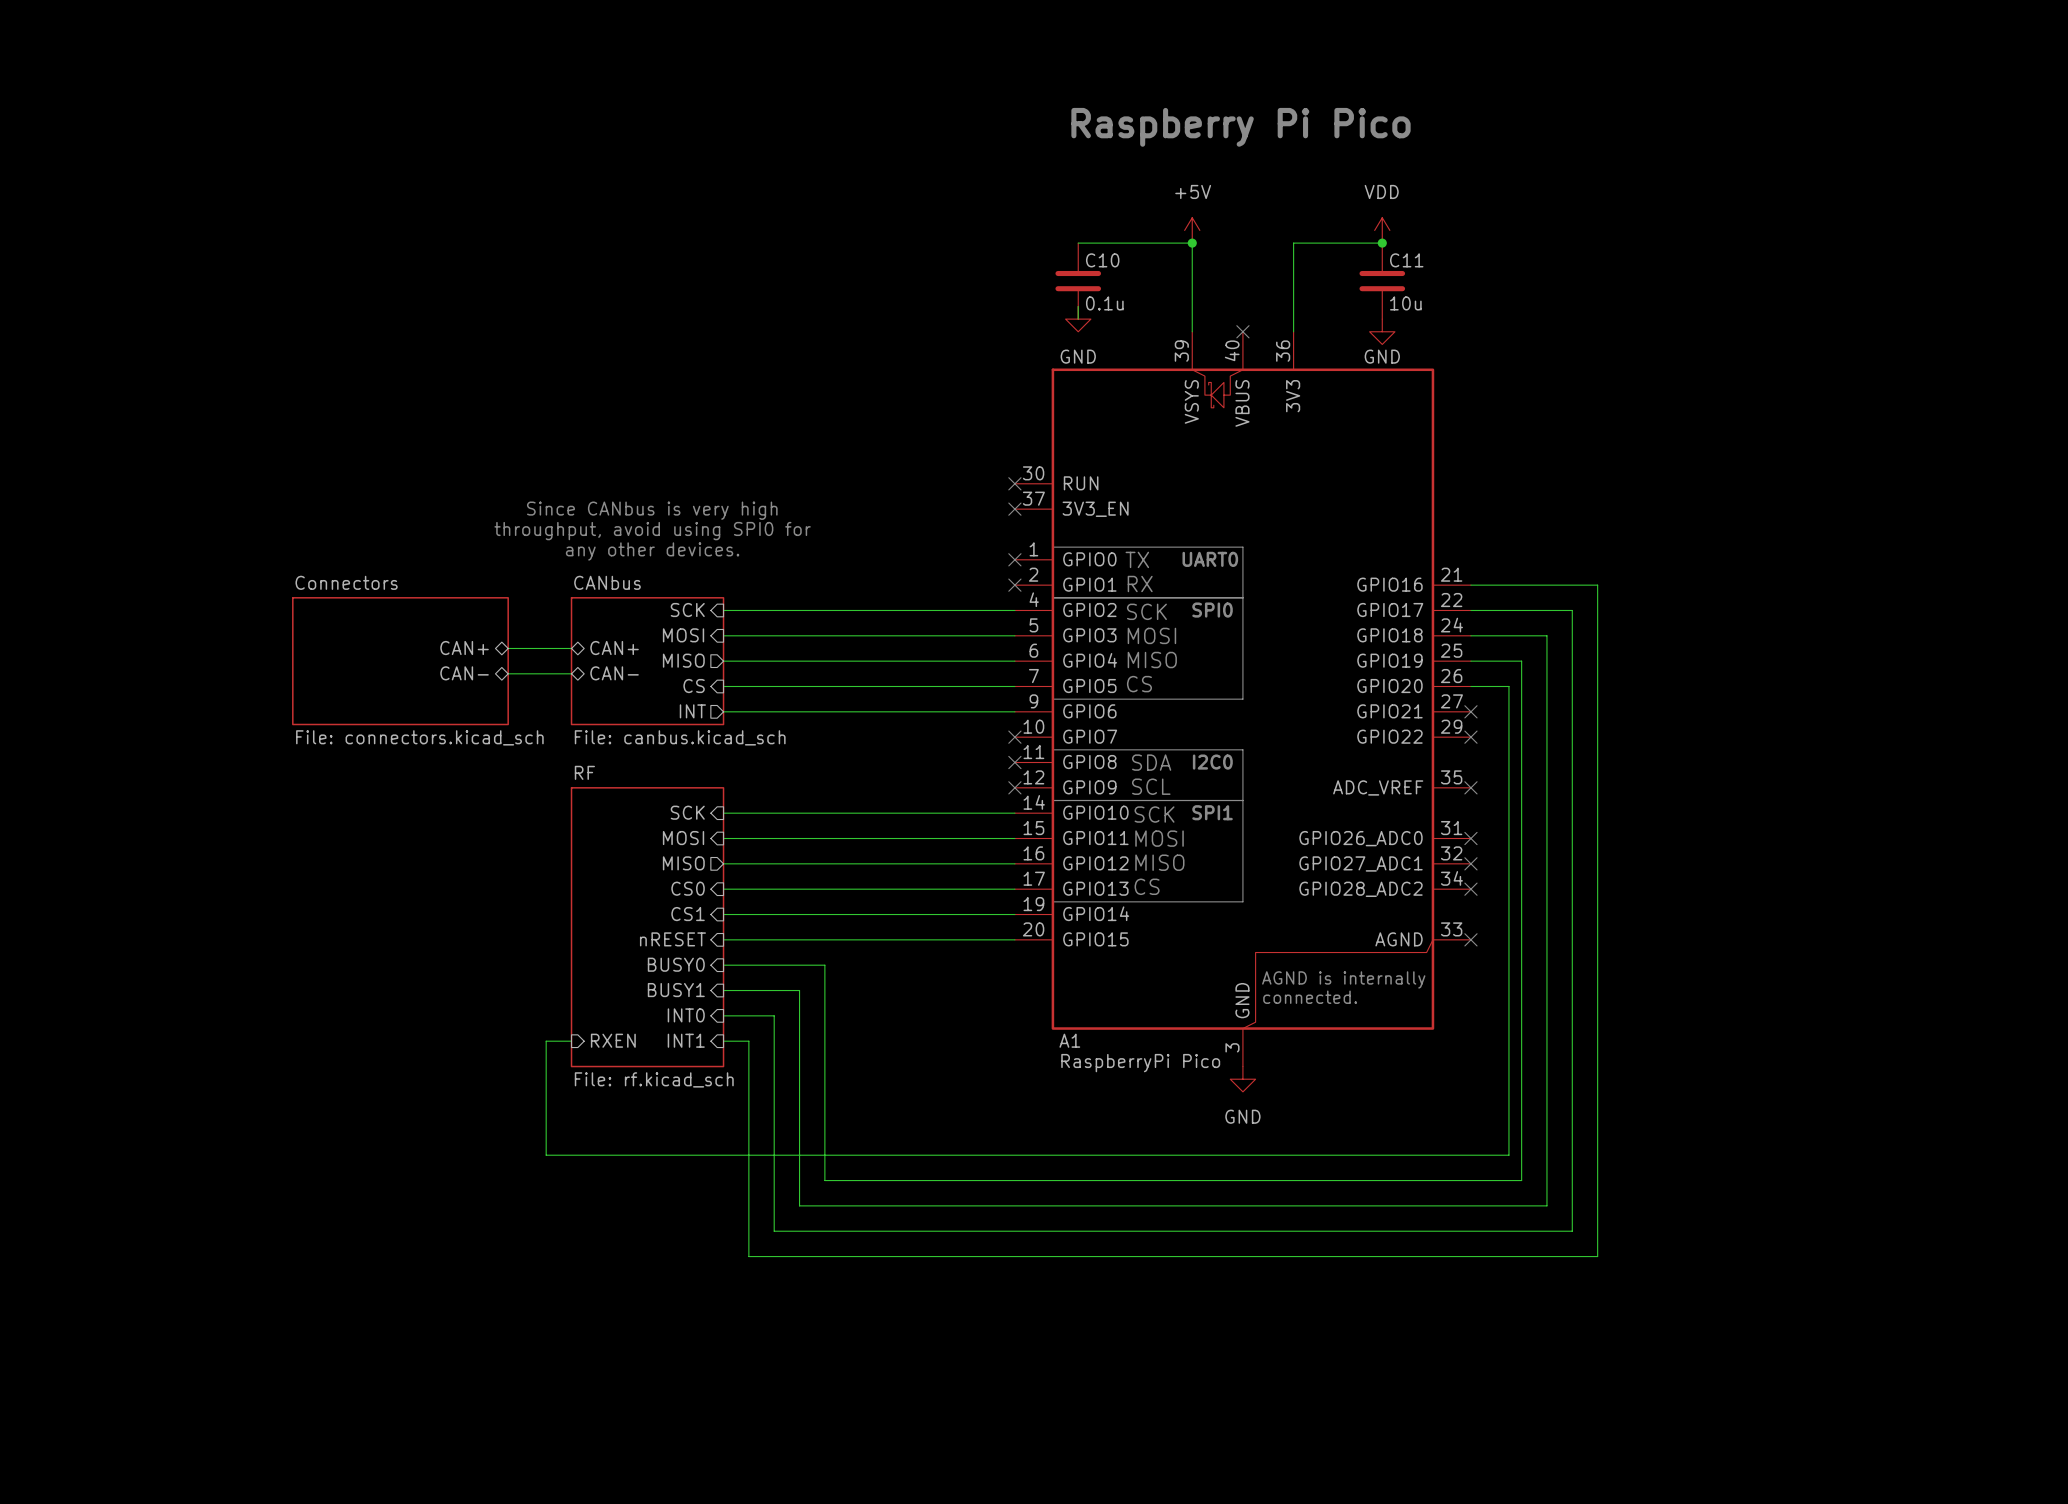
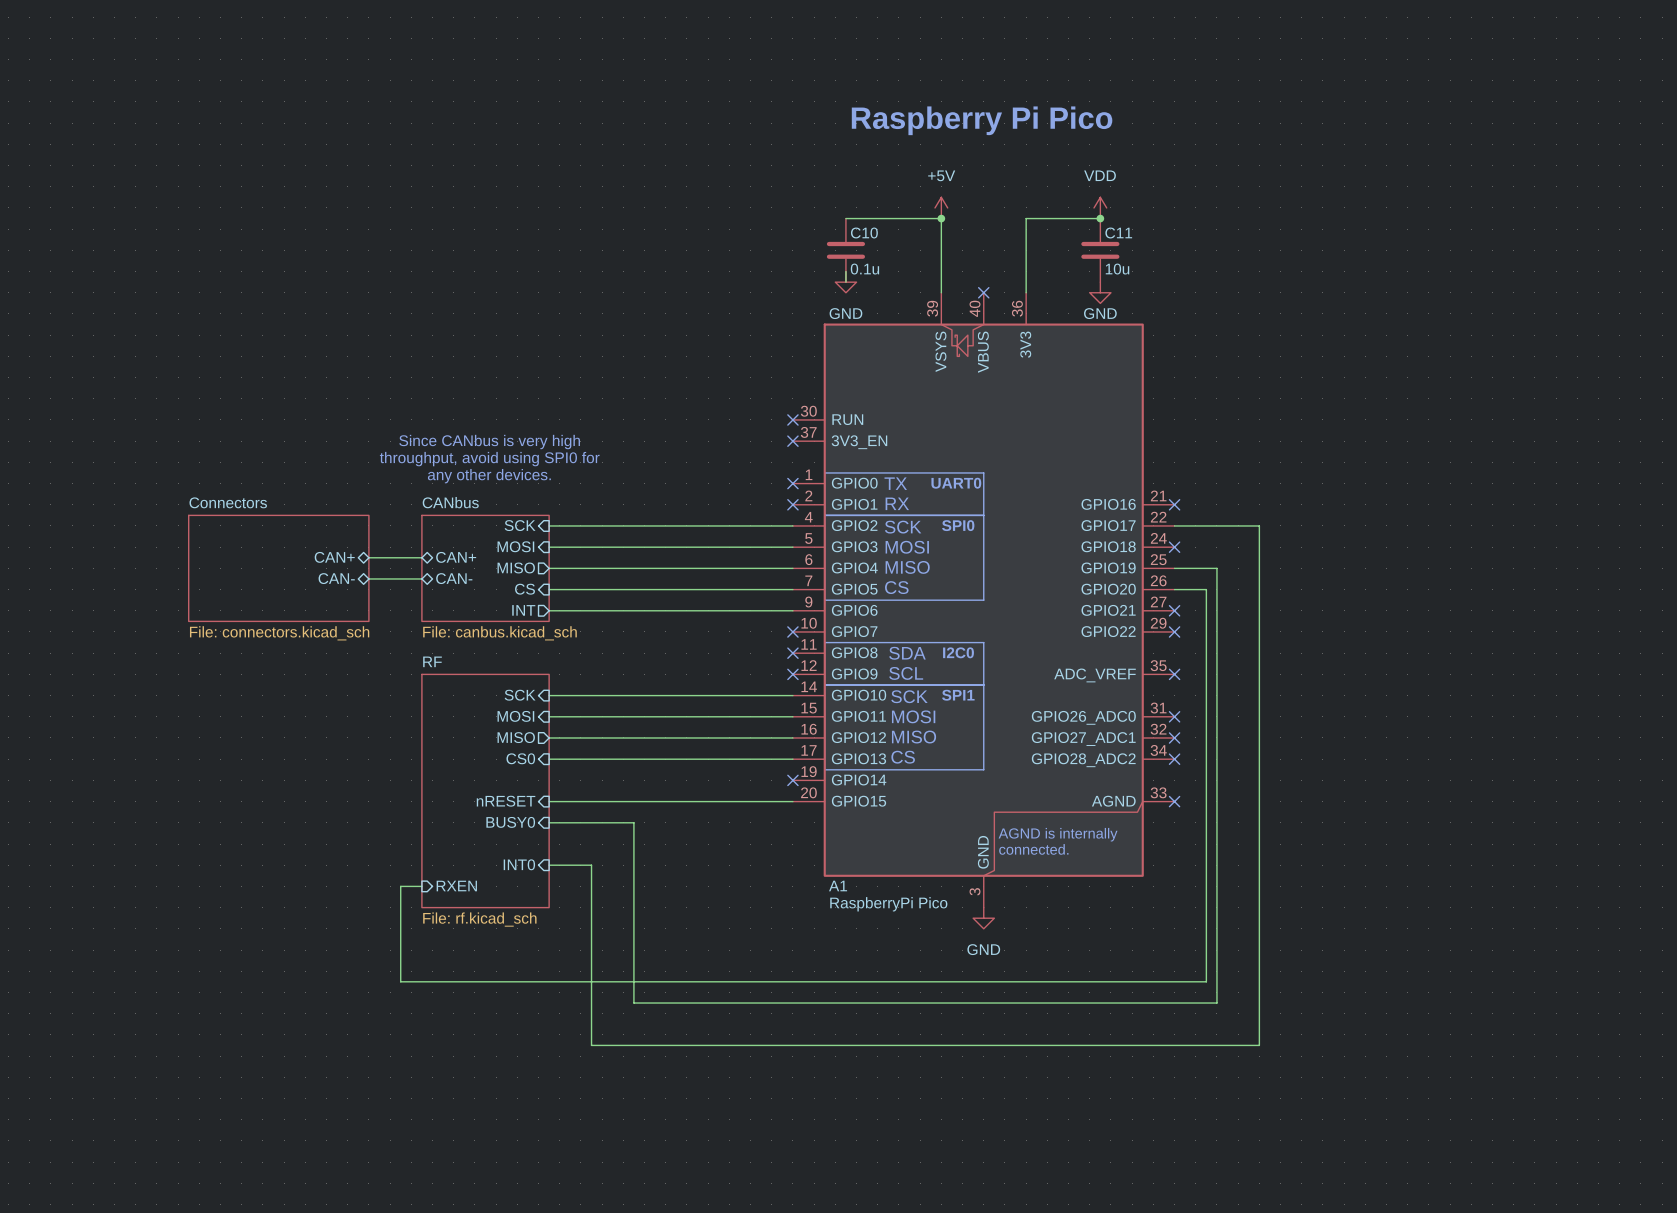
wire: (1470, 585) (1597, 585) (1597, 1256) (748, 1256) (748, 1041) (723, 1041) -> none
no-connect mark: none -> (1174, 504)
wire: (1470, 635) (1546, 635) (1546, 1205) (799, 1205) (799, 990) (723, 990) -> none
no-connect mark: none -> (1174, 547)
sheet pin: CS1 (688, 914) -> none
wire: (723, 914) (1014, 914) -> none
no-connect mark: none -> (792, 780)
sheet pin: BUSY1 (676, 990) -> none
sheet pin: INT1 (686, 1040) -> none

